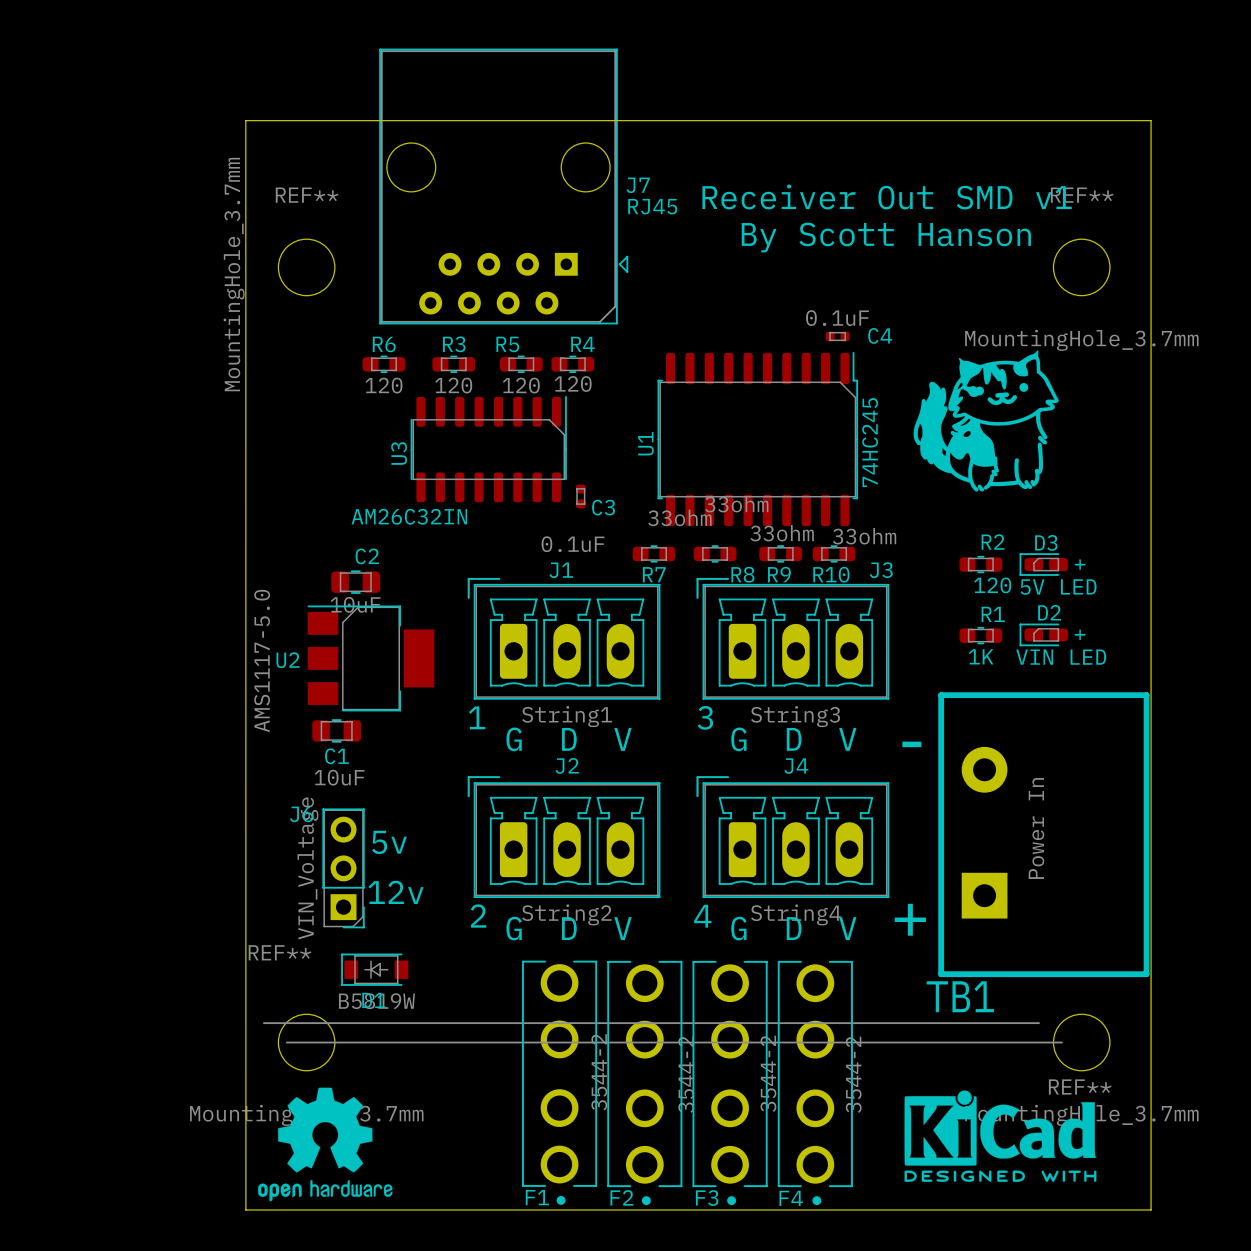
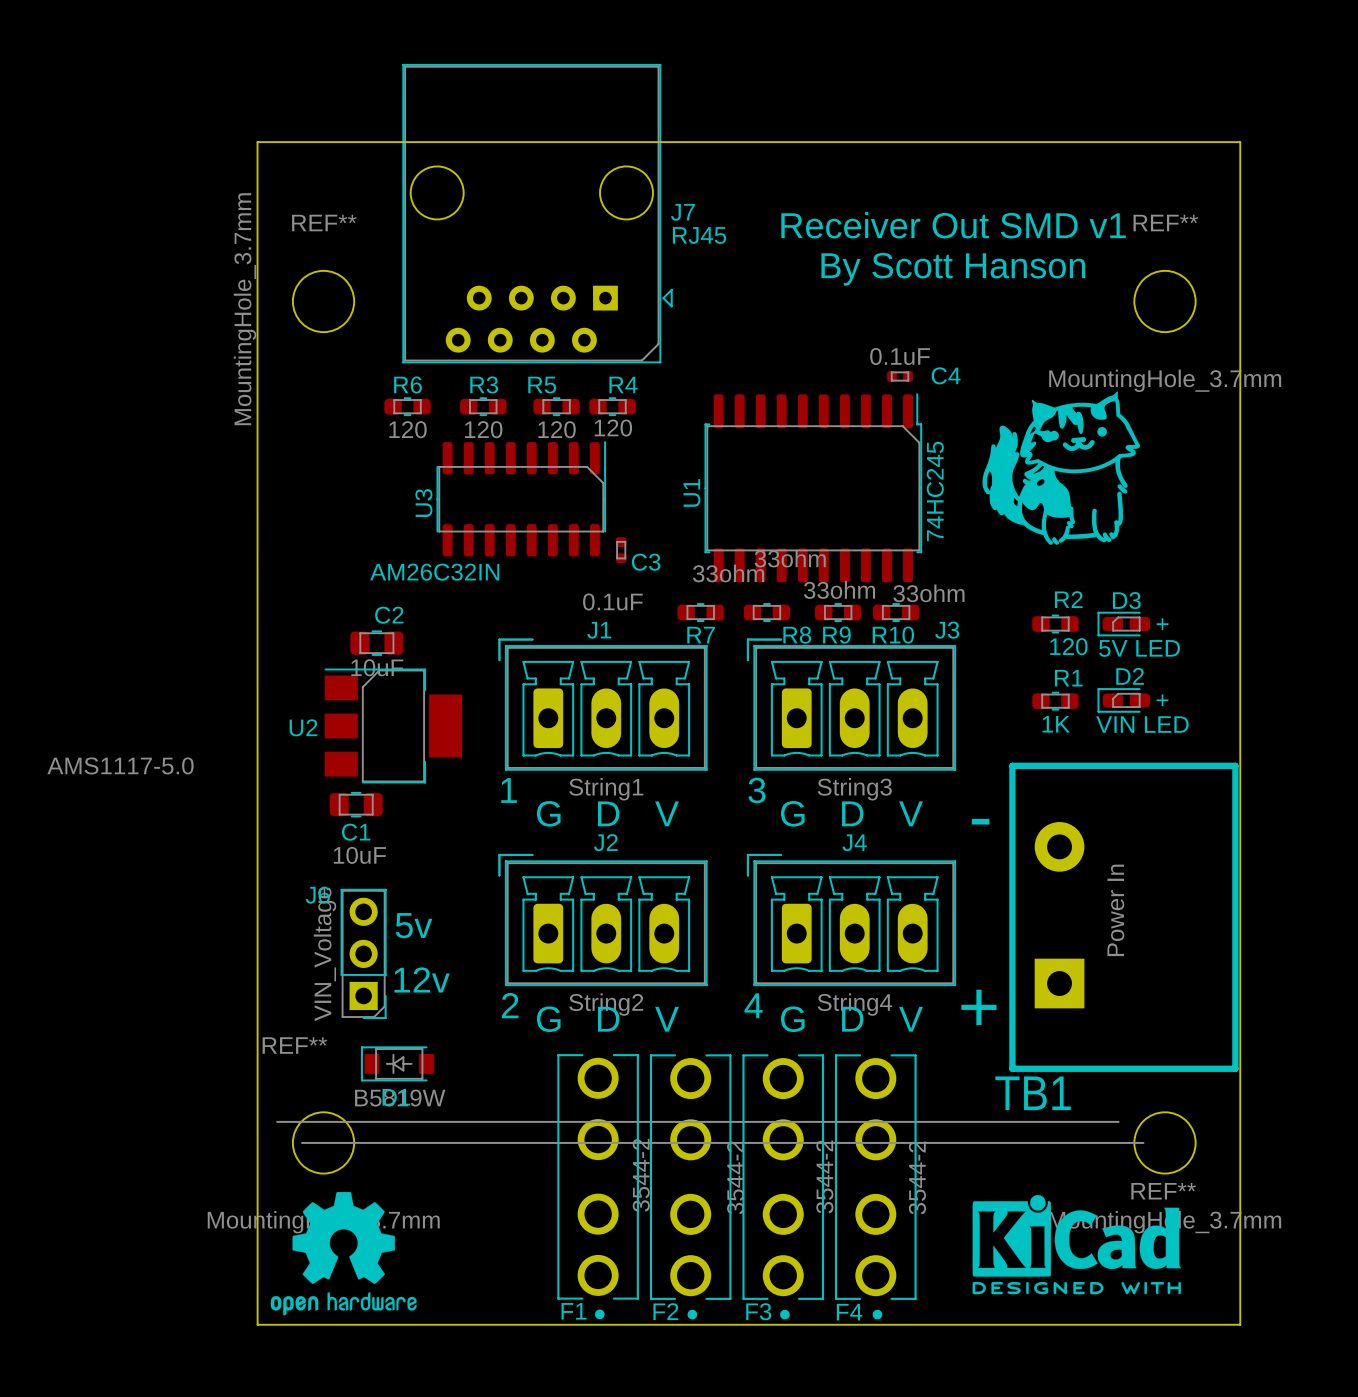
U2 value rotation: 0° (262, 661) -> 90° clockwise (120, 765)

